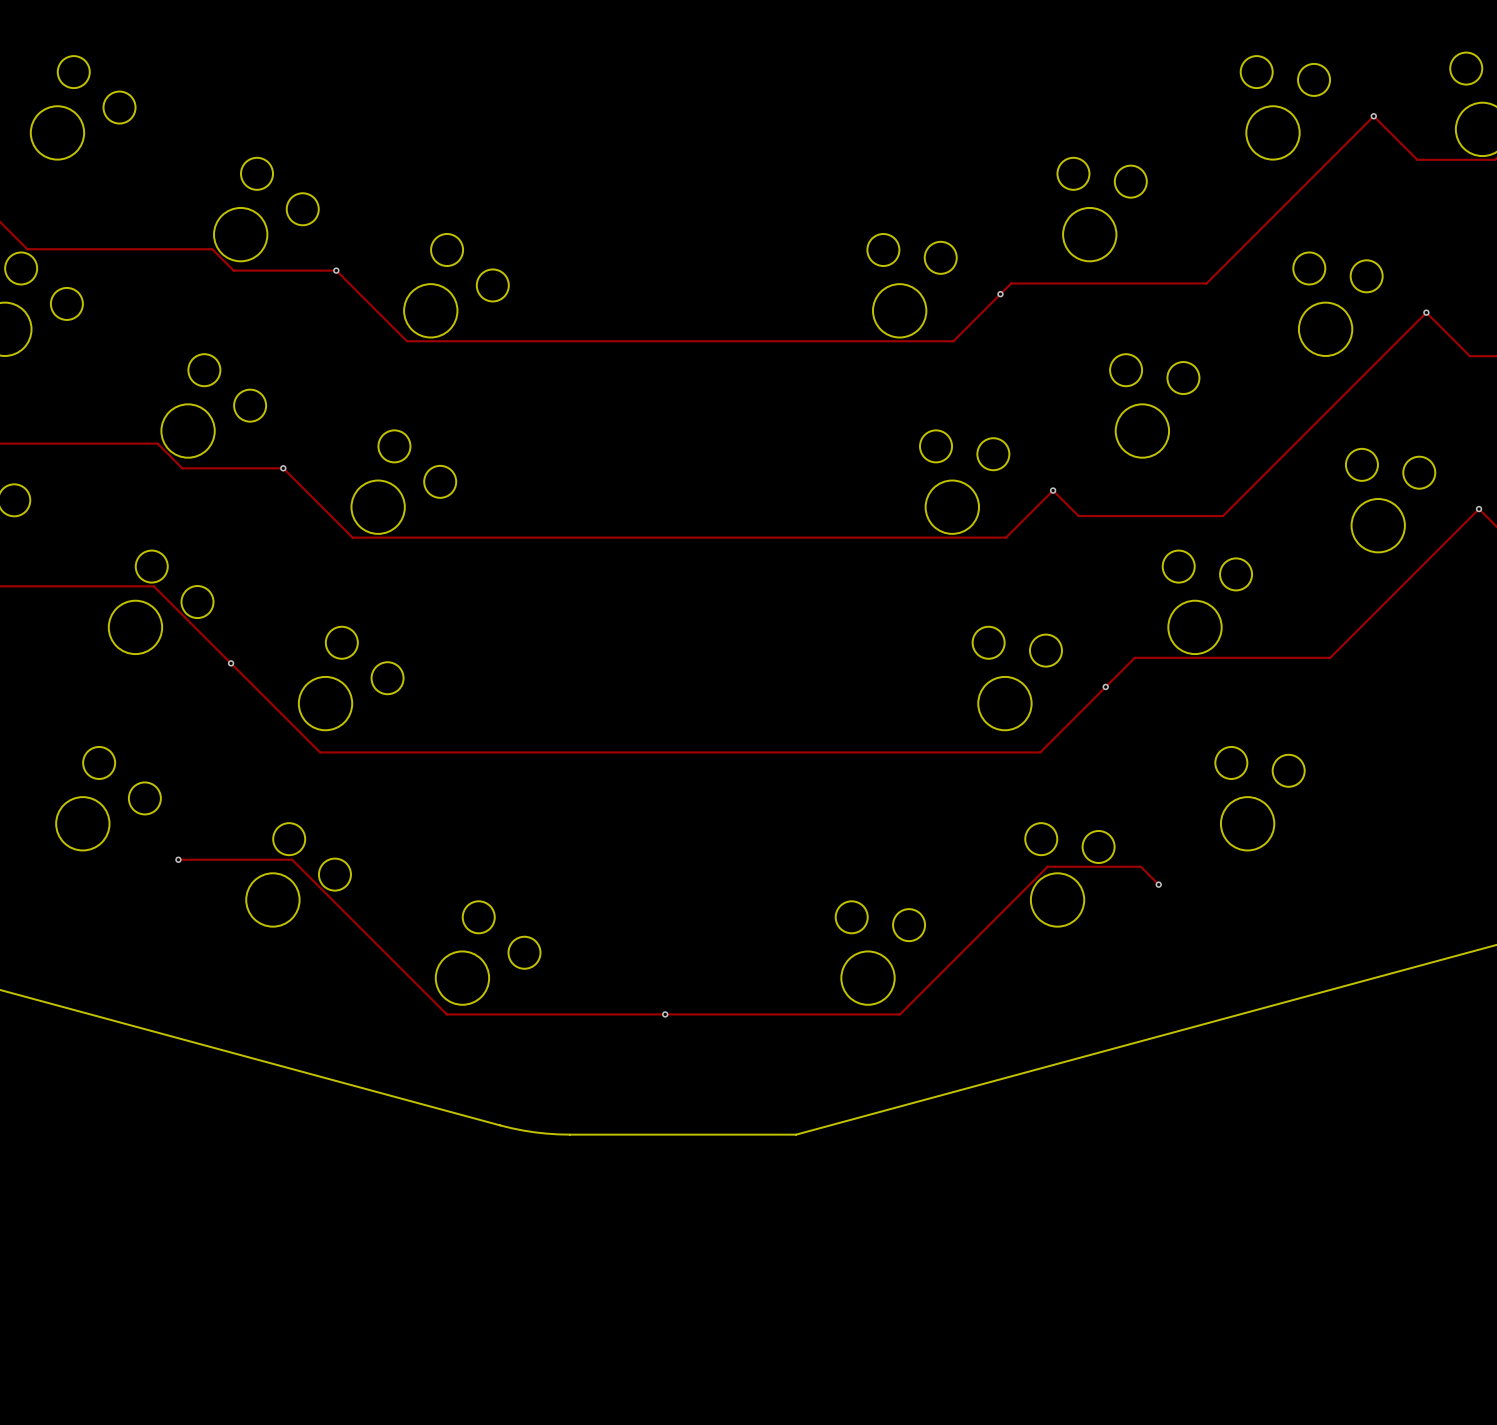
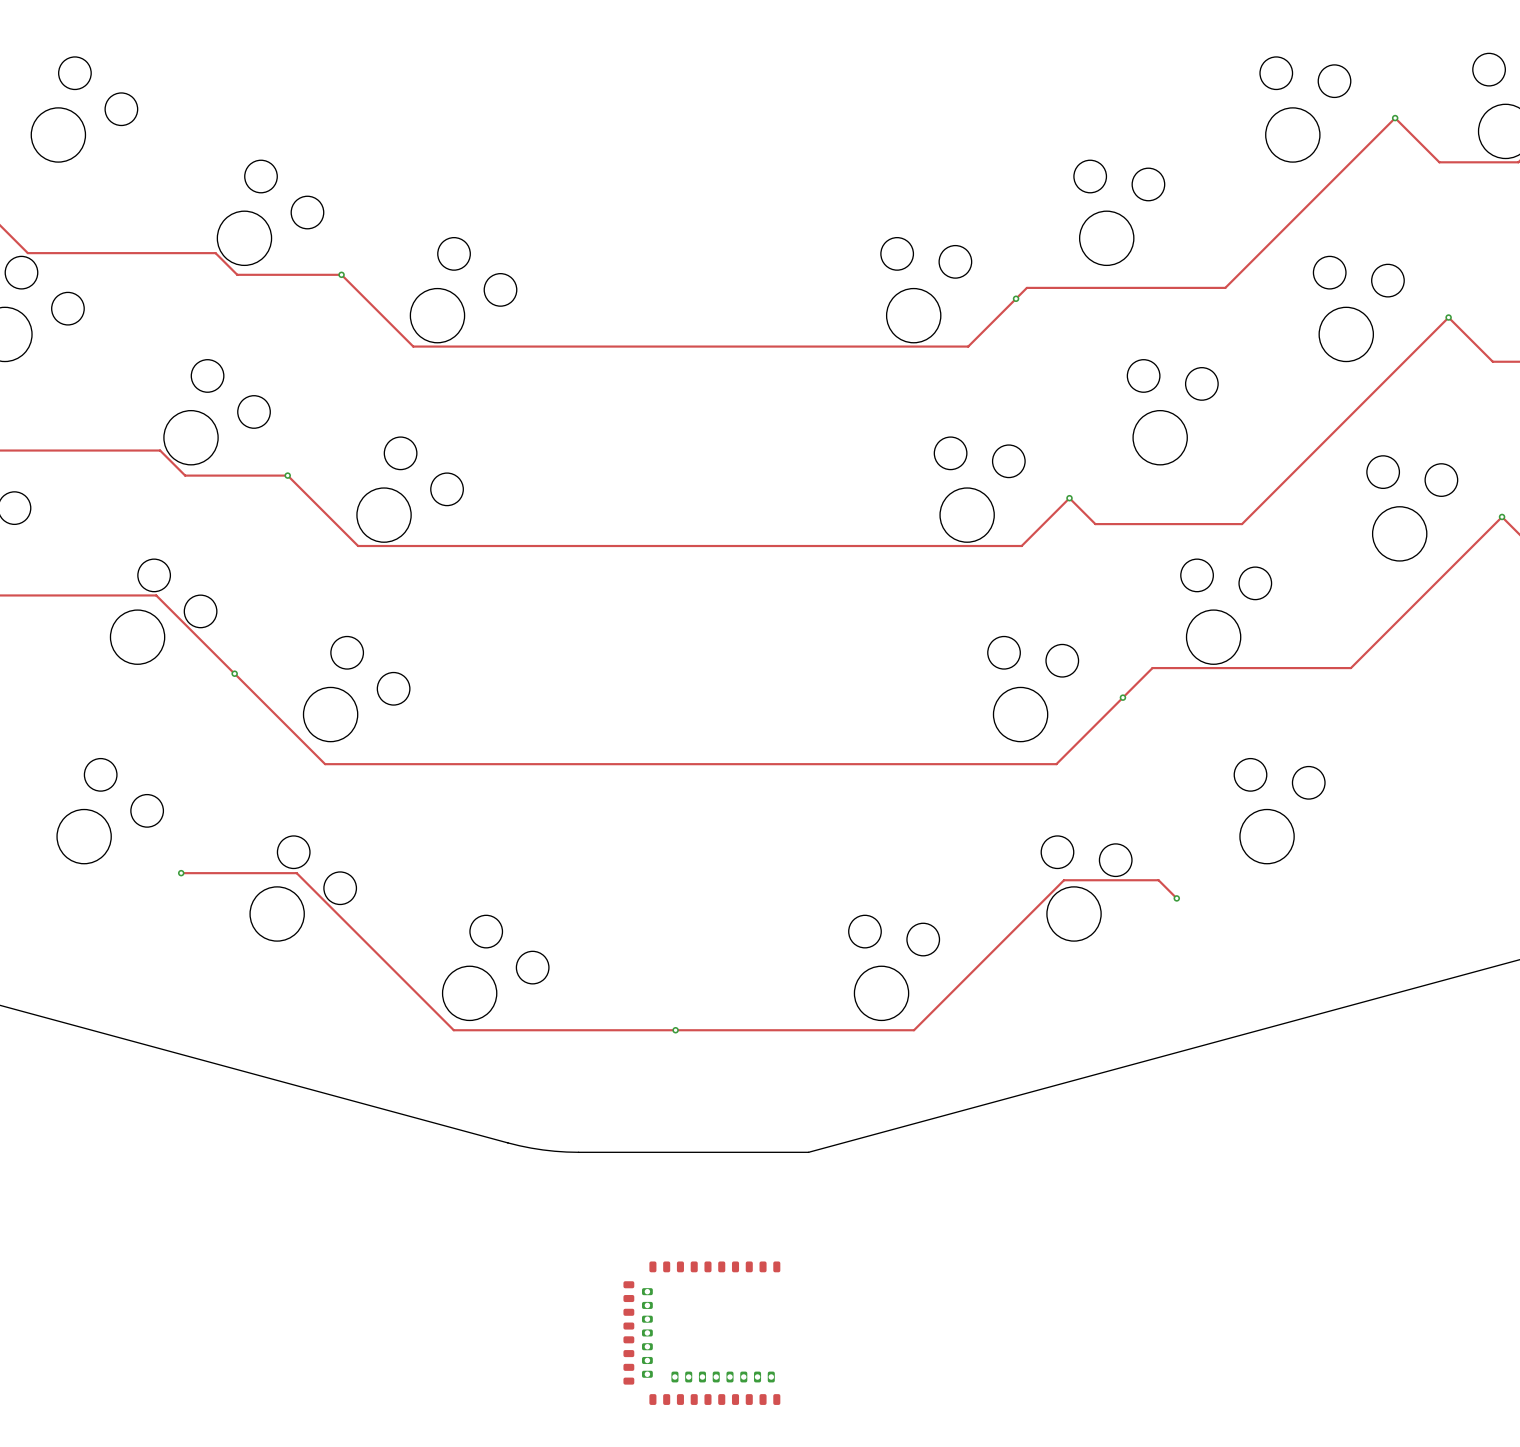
part: none -> (701, 1333)

